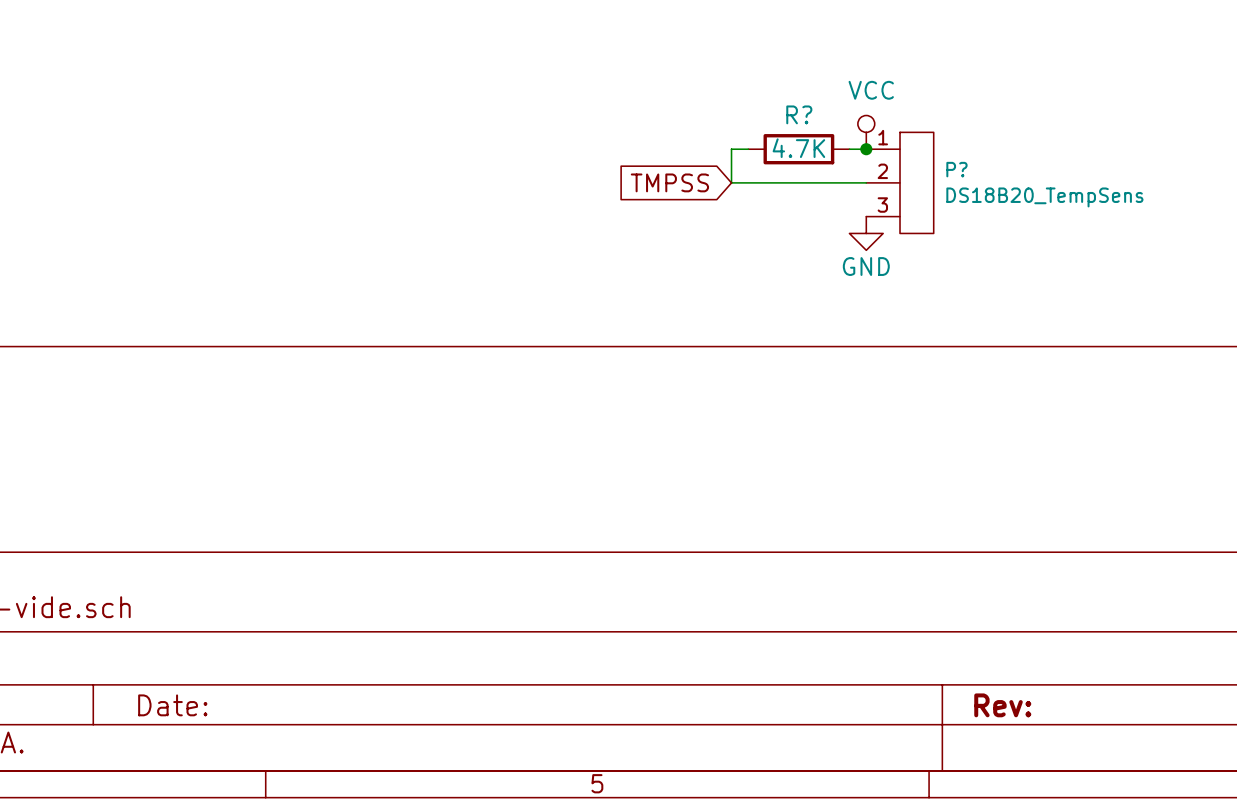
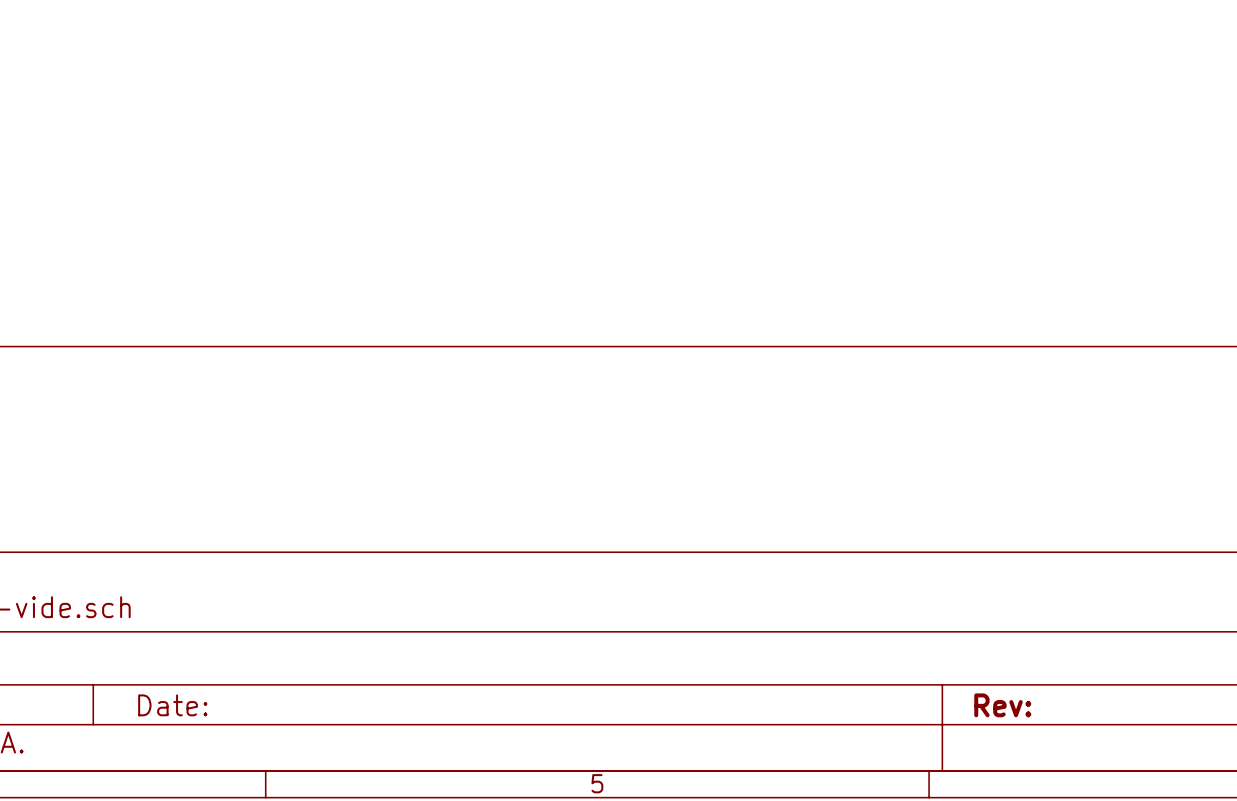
power symbol: VCC (866, 132) -> none
wire: (748, 149) (731, 149) (731, 182) (866, 182) -> none
R?: 4.7K (798, 149) -> none
wire: (849, 149) (866, 149) -> none
junction: (866, 149) -> none
global label: TMPSS (669, 182) -> none
P?: DS18B20_TempSens (900, 182) -> none
power symbol: GND (866, 233) -> none

